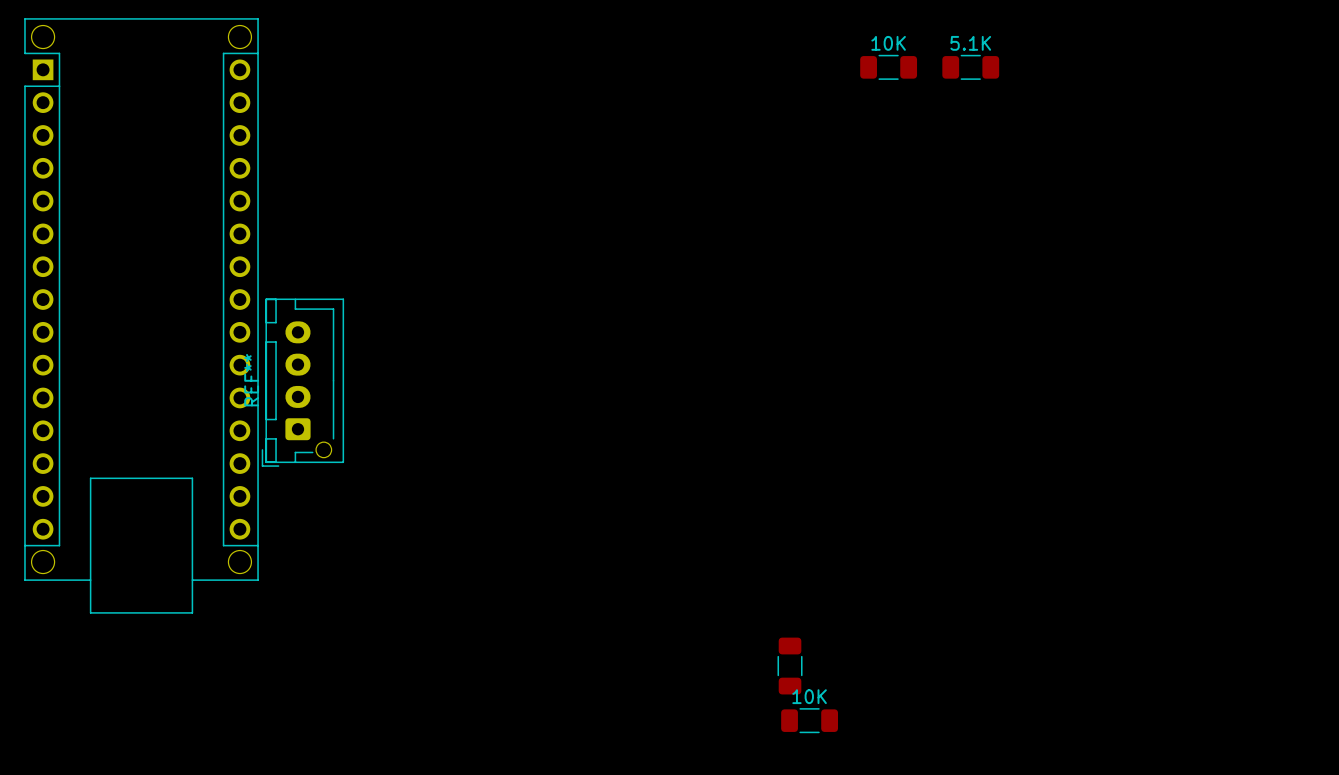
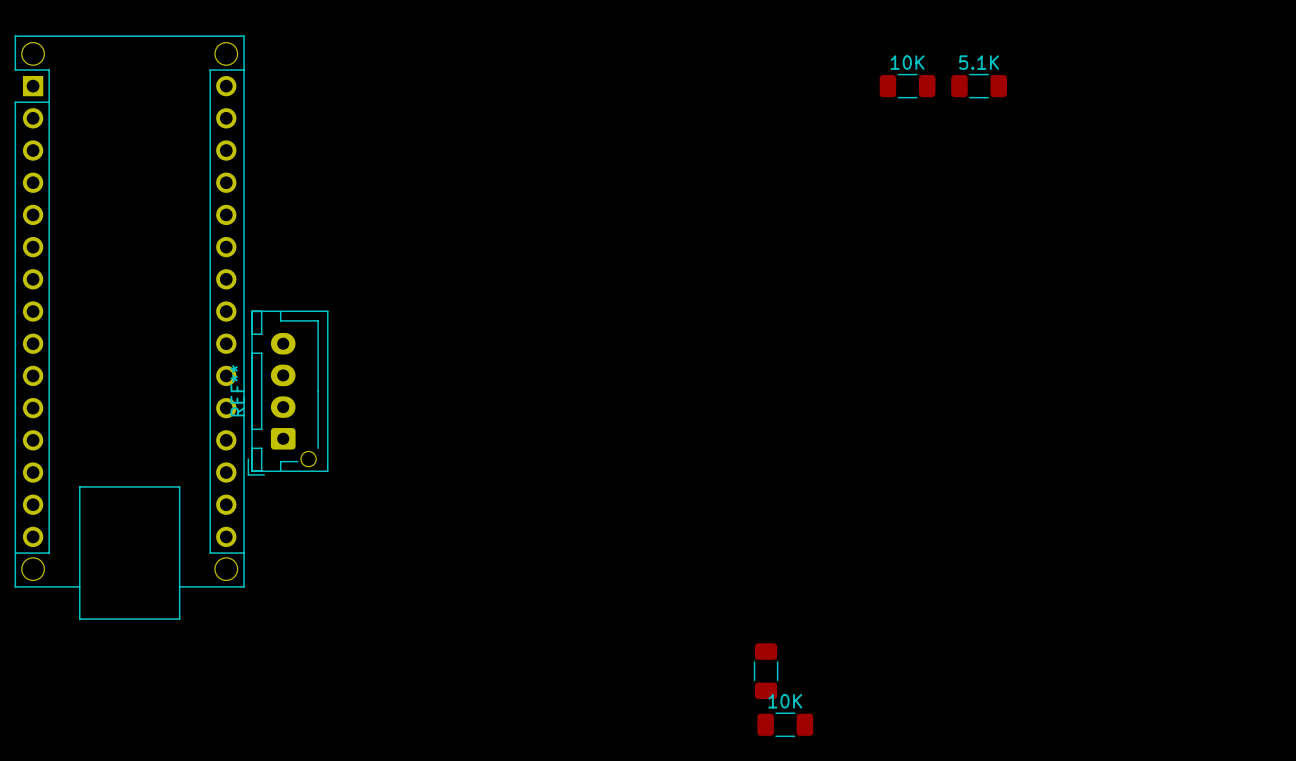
10K position: (888, 67) -> (907, 86)
5.1K position: (970, 67) -> (979, 86)

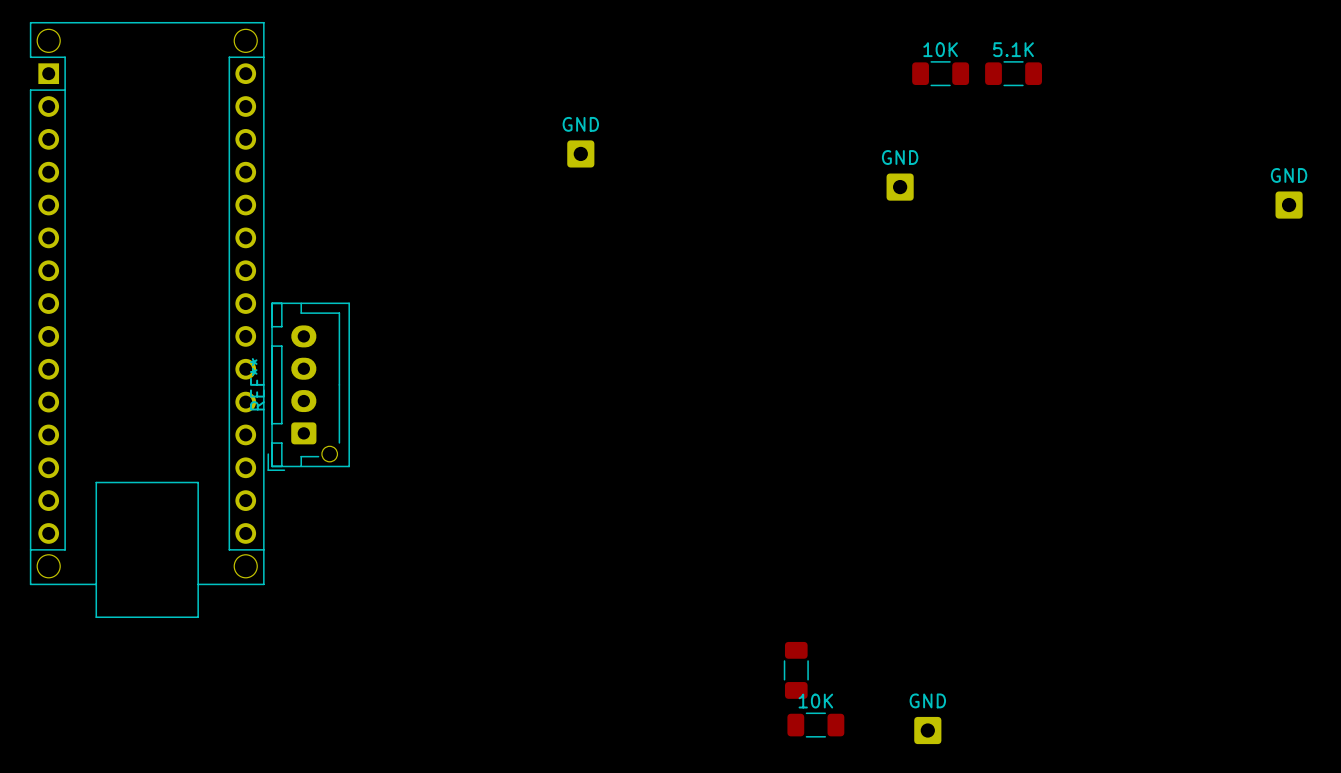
GND: none -> (580, 153)
GND: none -> (900, 187)
GND: none -> (1289, 205)
GND: none -> (927, 730)

